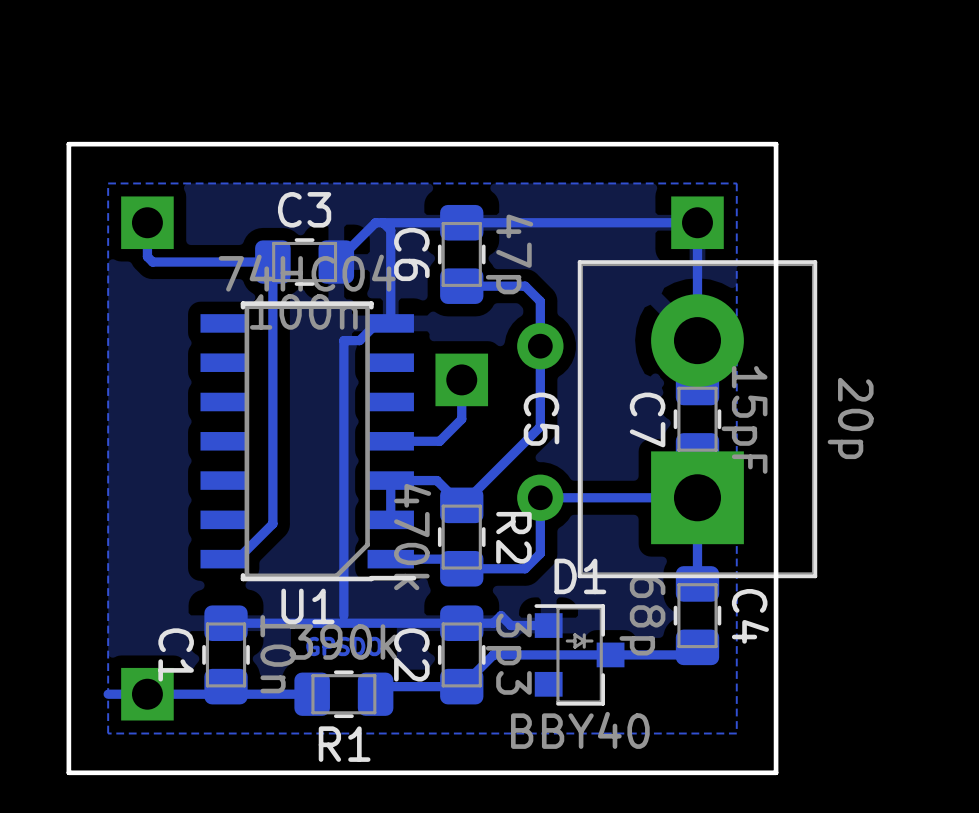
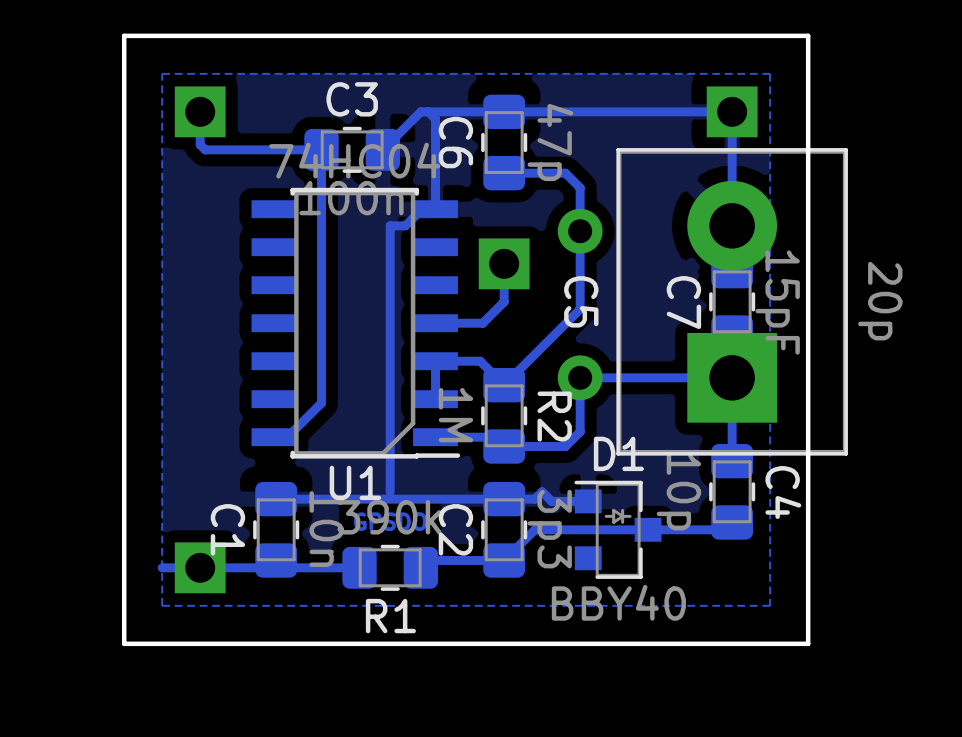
R2 value: 470k (412, 537) -> 1M (455, 415)
C4 value: 68p (642, 615) -> 10p (678, 491)

